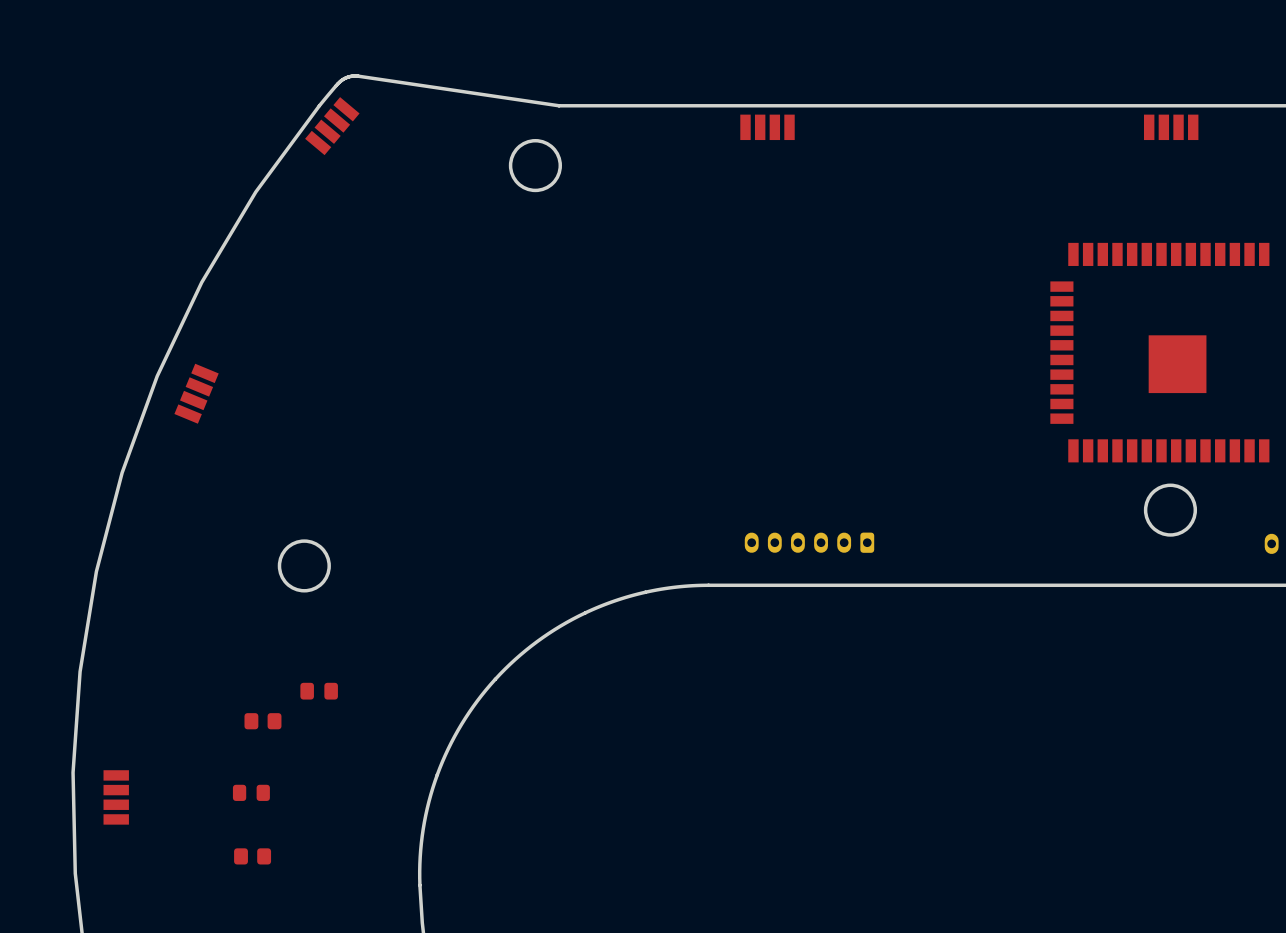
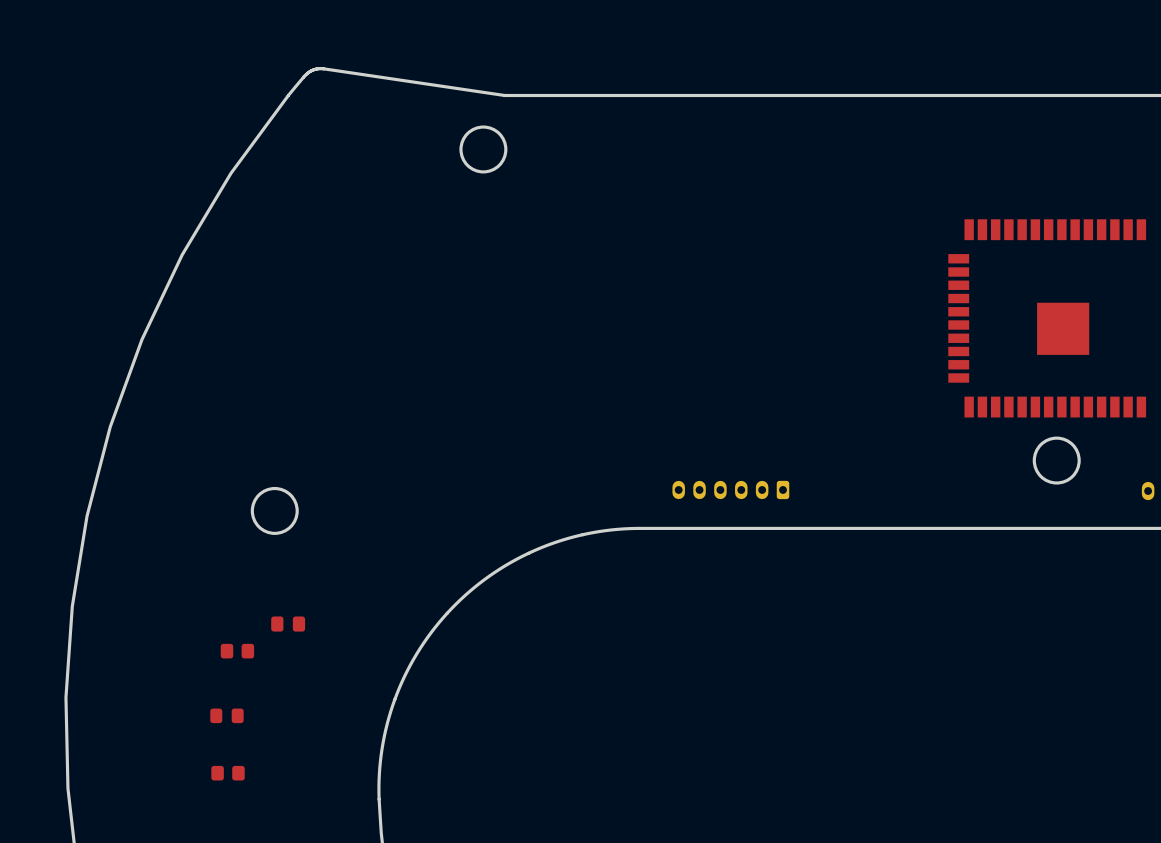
part: (332, 126) -> none
part: (767, 127) -> none
part: (1171, 127) -> none
part: (196, 393) -> none
part: (116, 797) -> none

